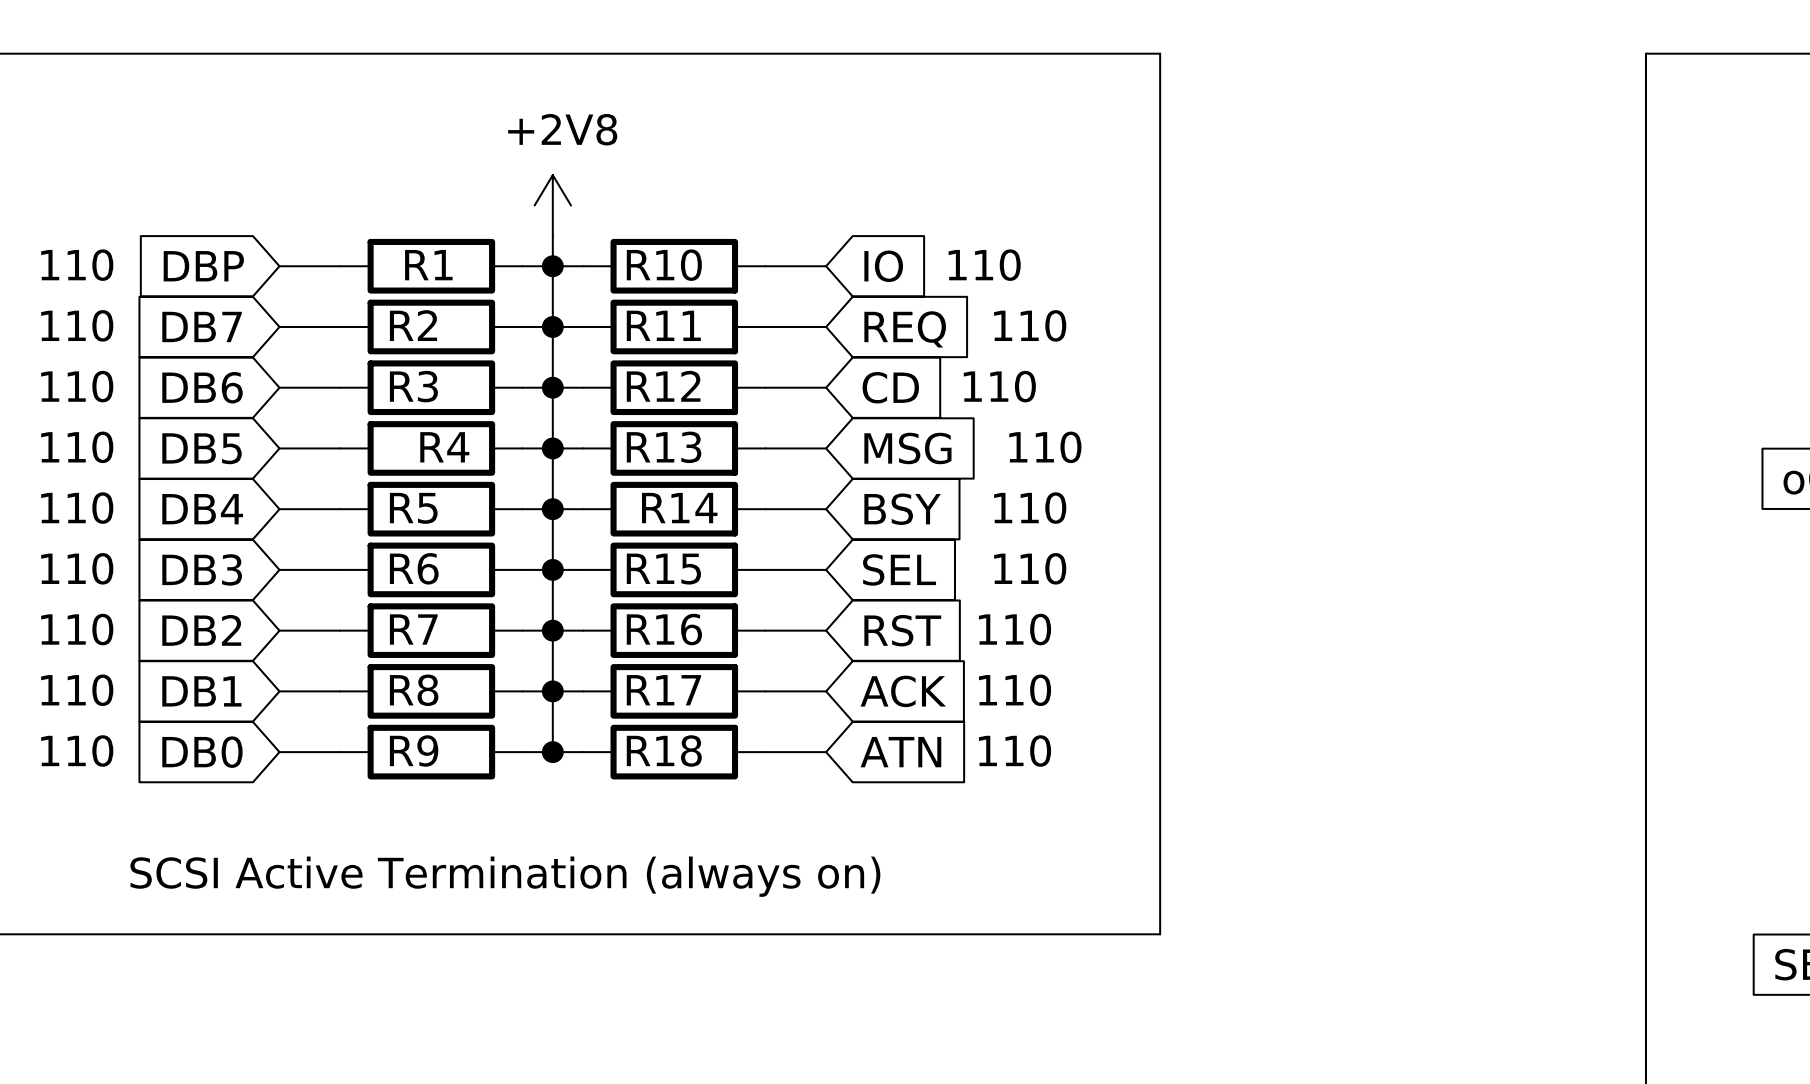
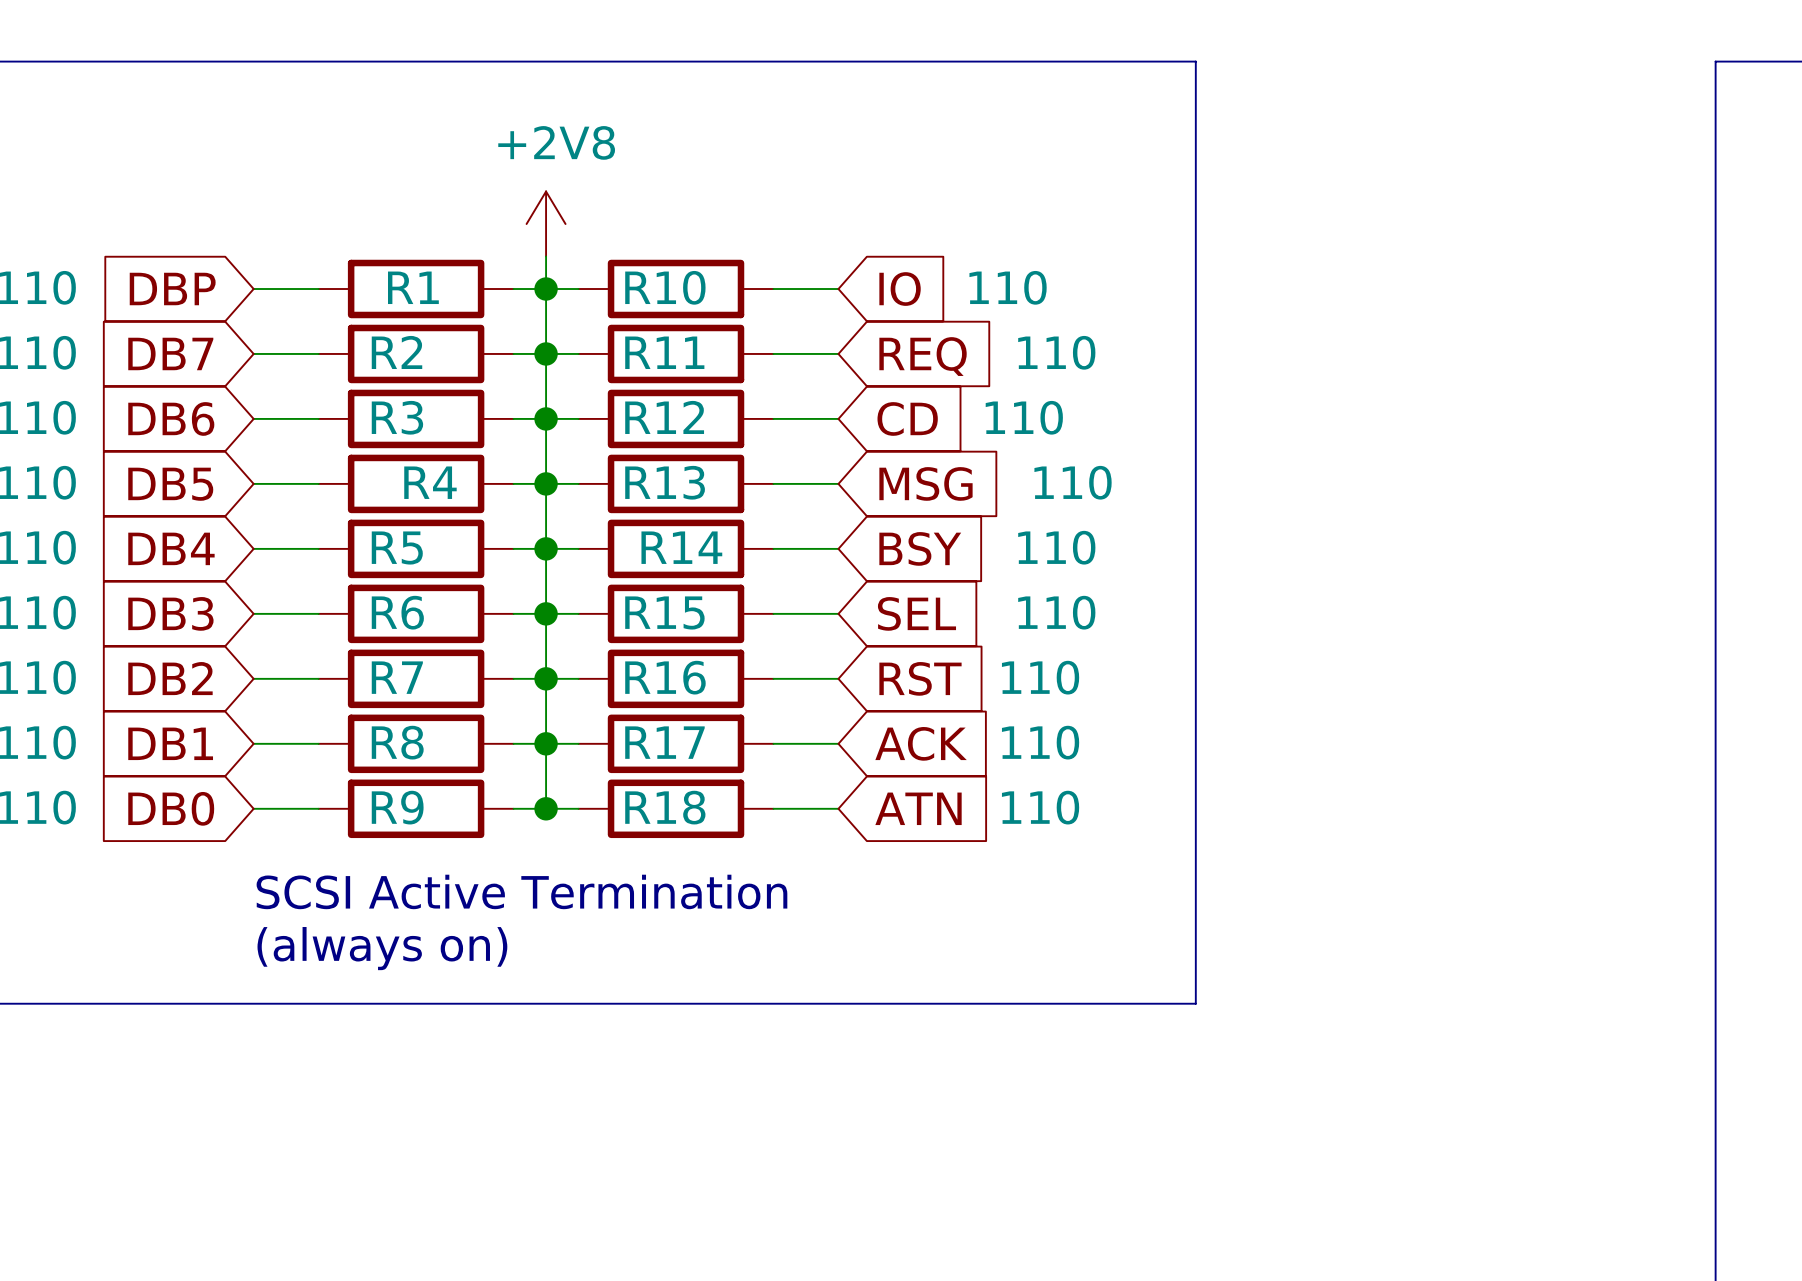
text: SCSI Active Termination (always on) (505, 876) -> SCSI Active Termination (521, 891)
text: none -> (always on) (382, 948)

